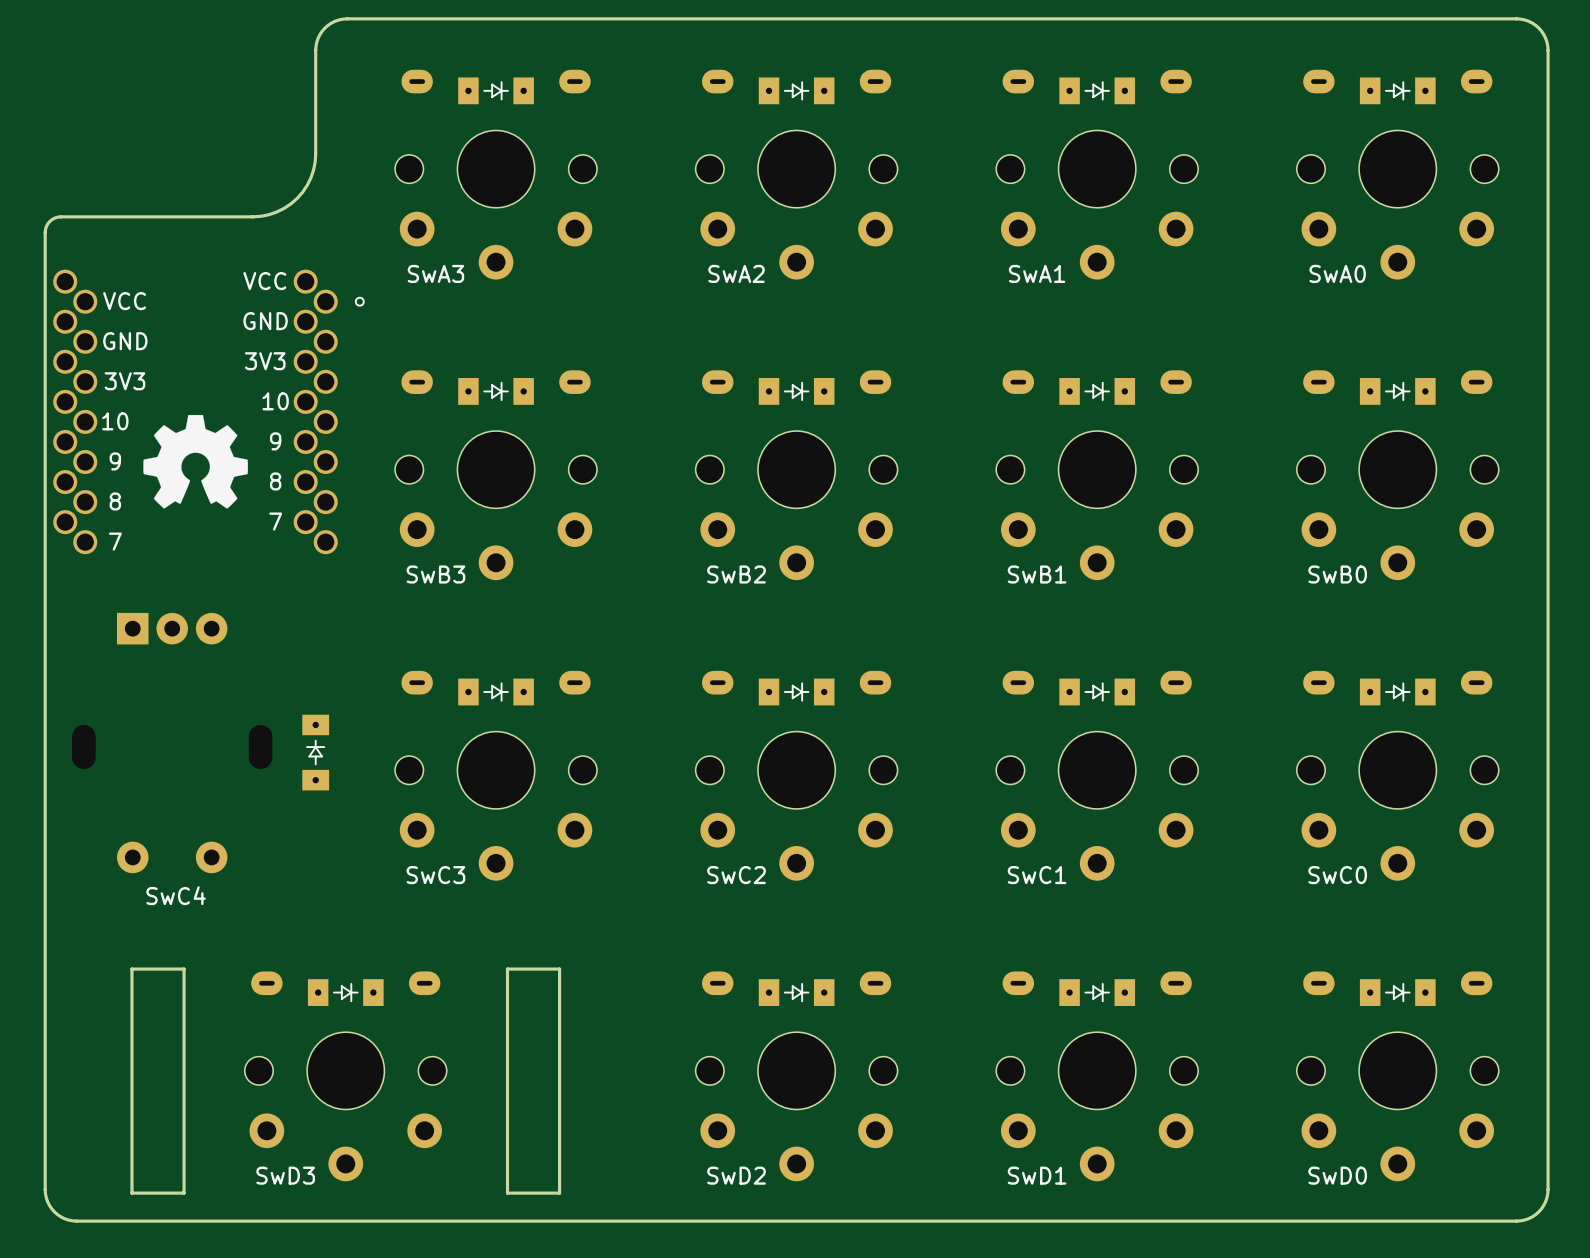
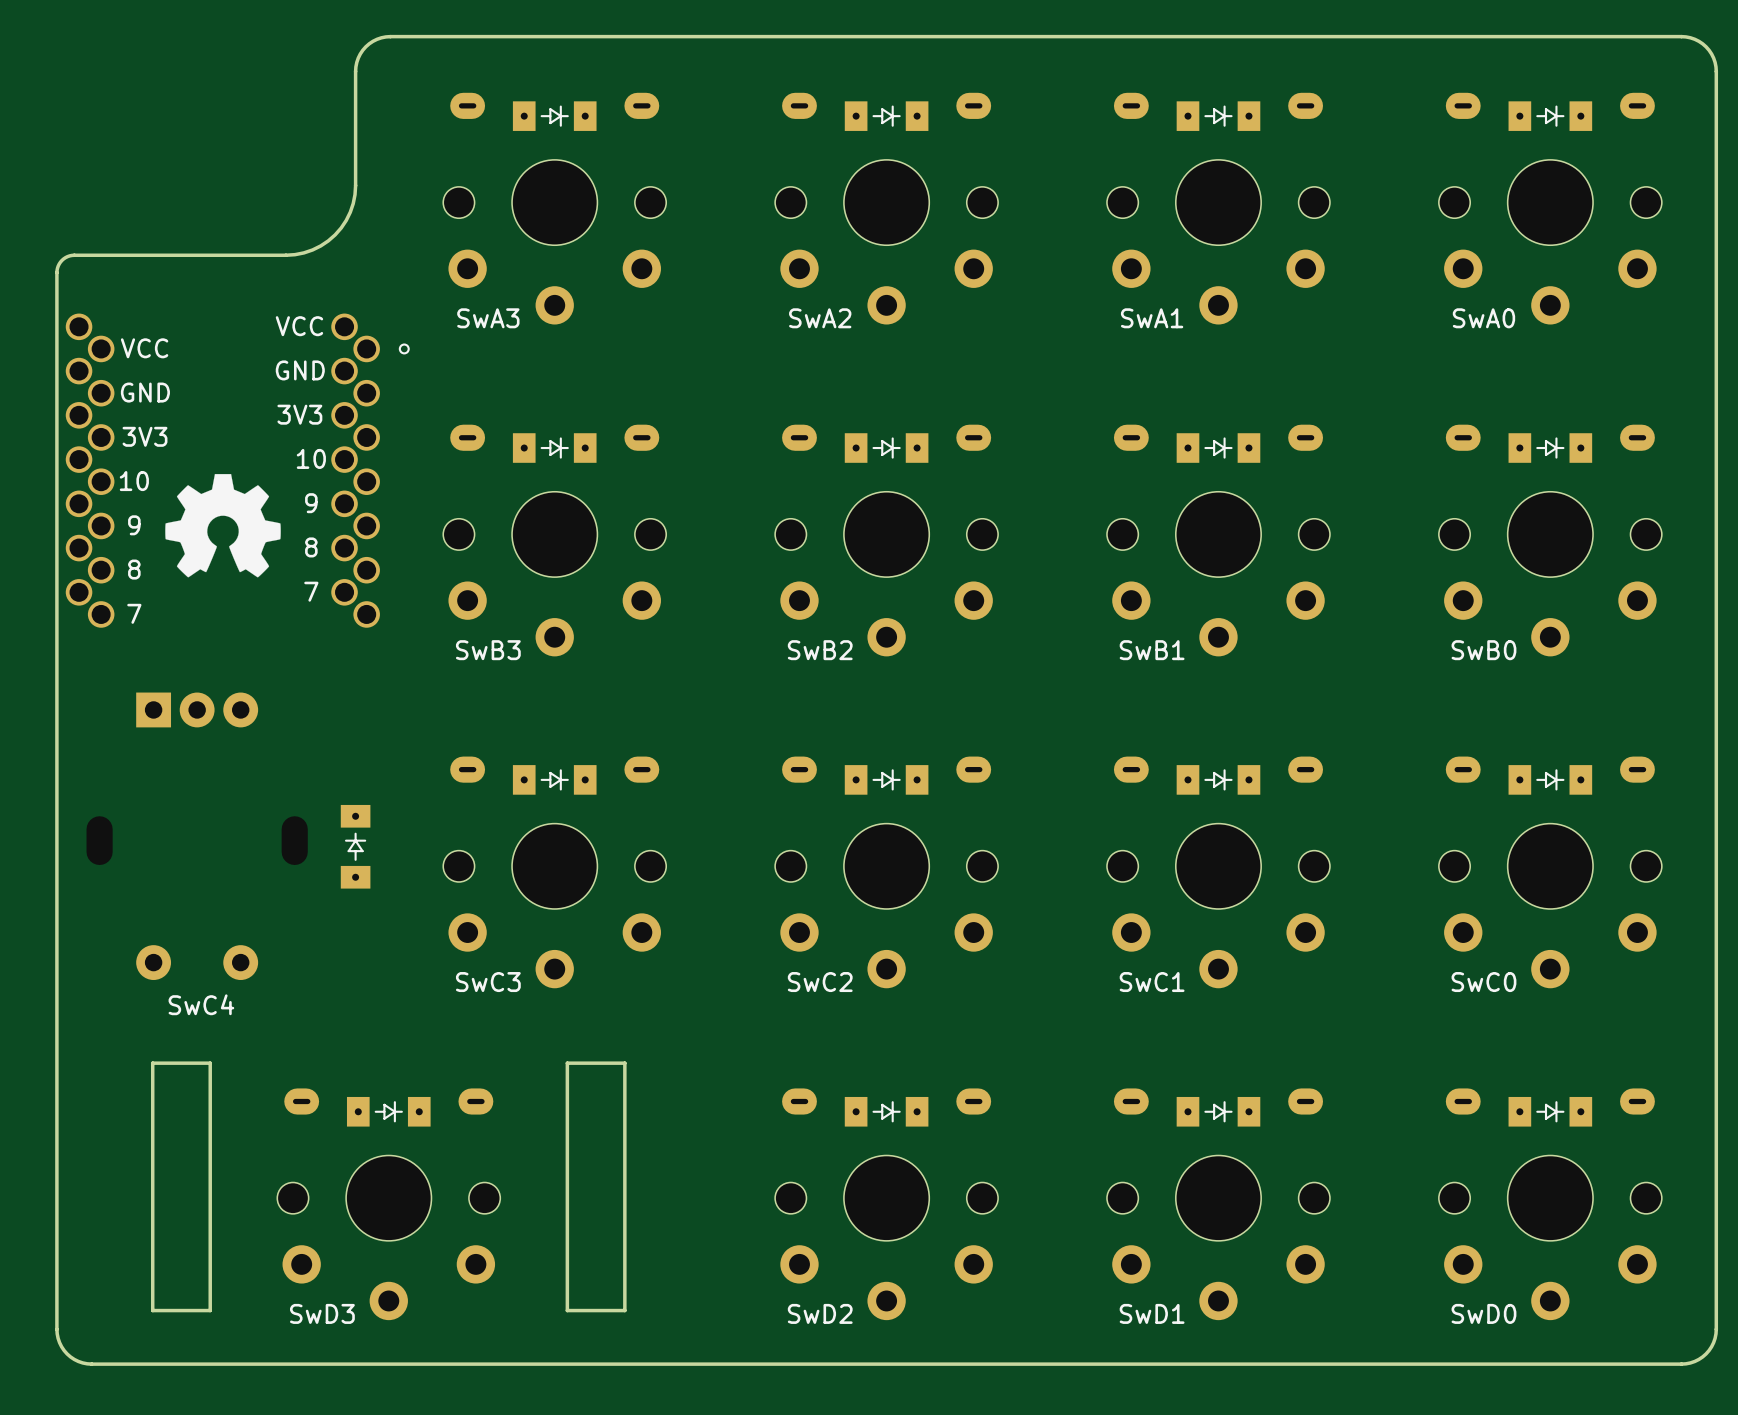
drawing shape: [43, 17, 1550, 1223] -> [55, 34, 1719, 1366]
SwD3 footprint: [244, 971, 447, 1182] -> [150, 1061, 627, 1321]

